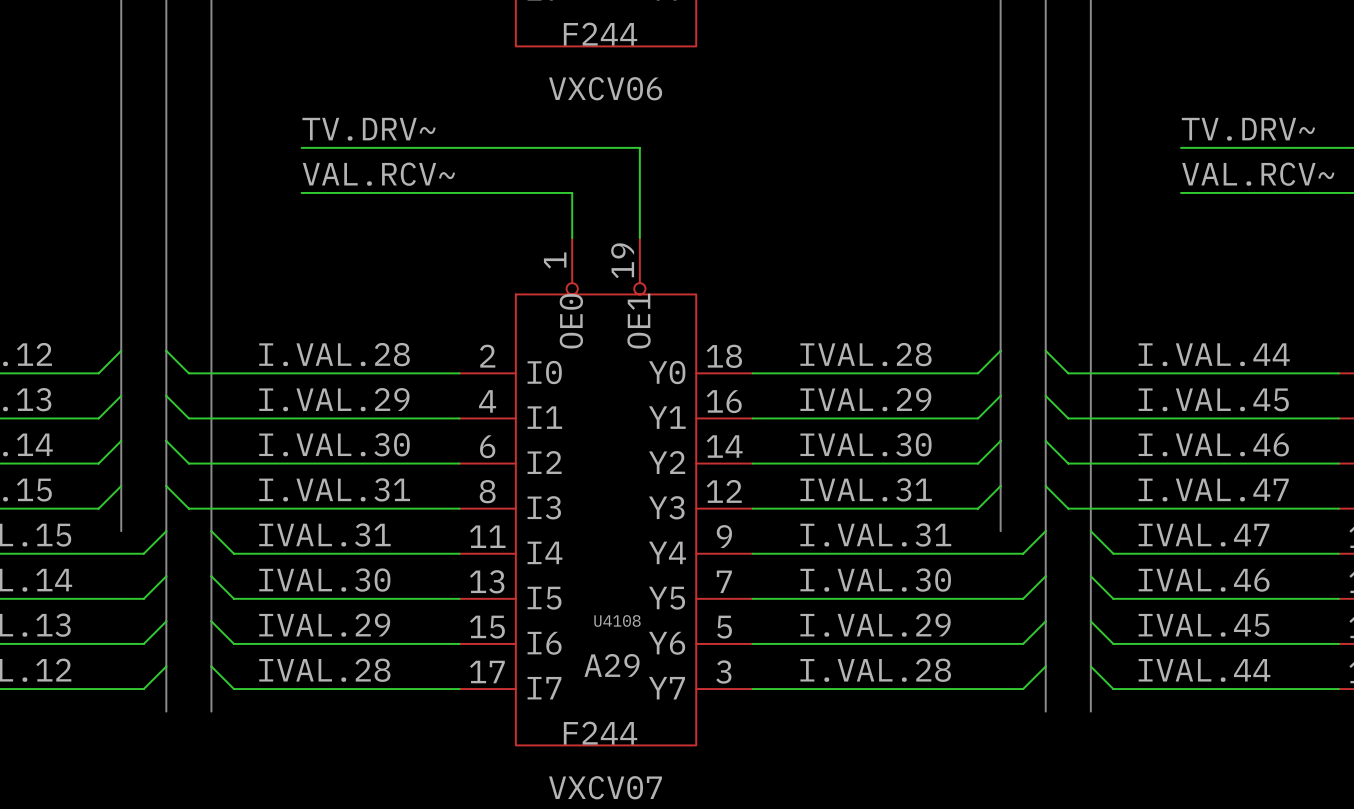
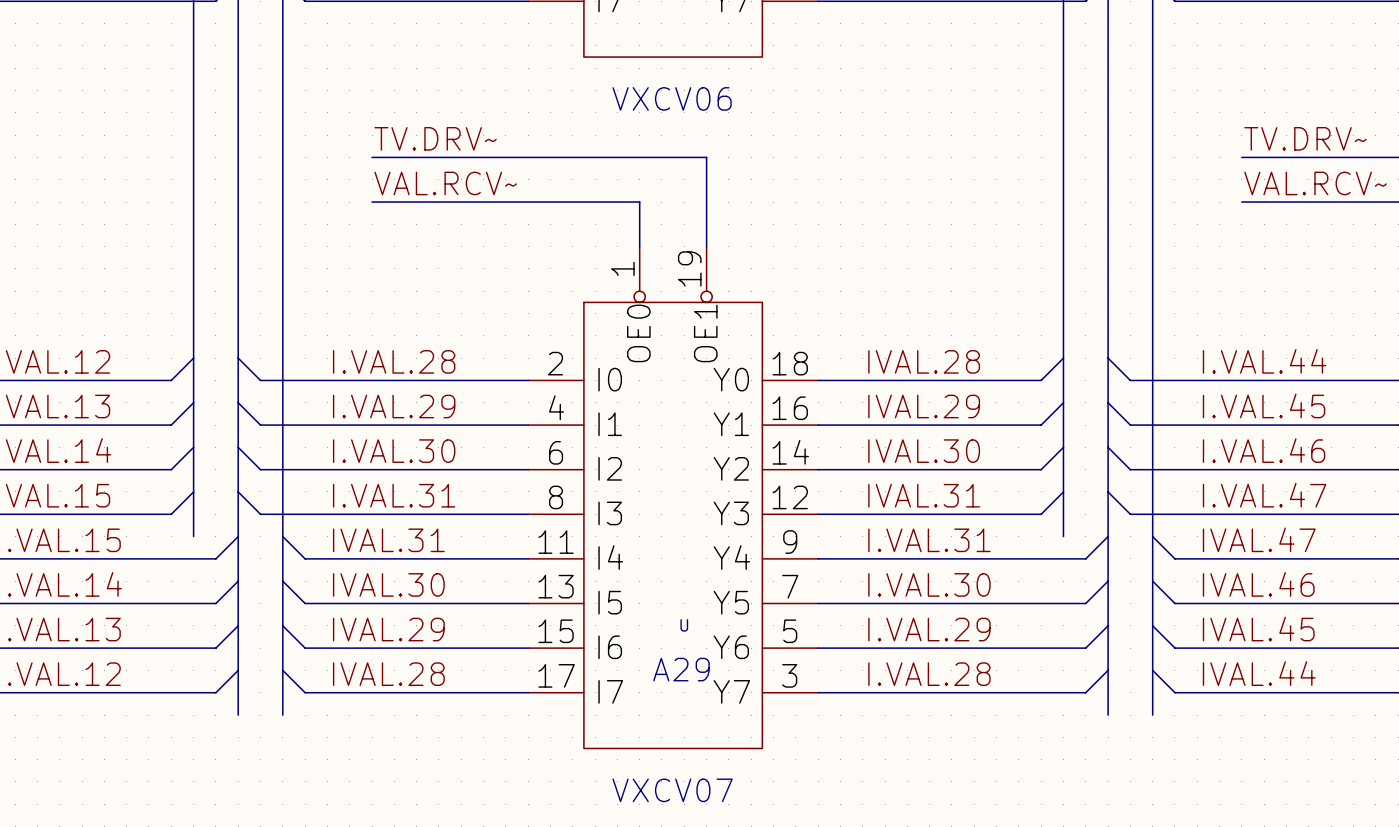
part value: F244 (600, 34) -> none
U4108 name: U4108 (617, 620) -> U (684, 625)
U4108 value: F244 (600, 733) -> none

